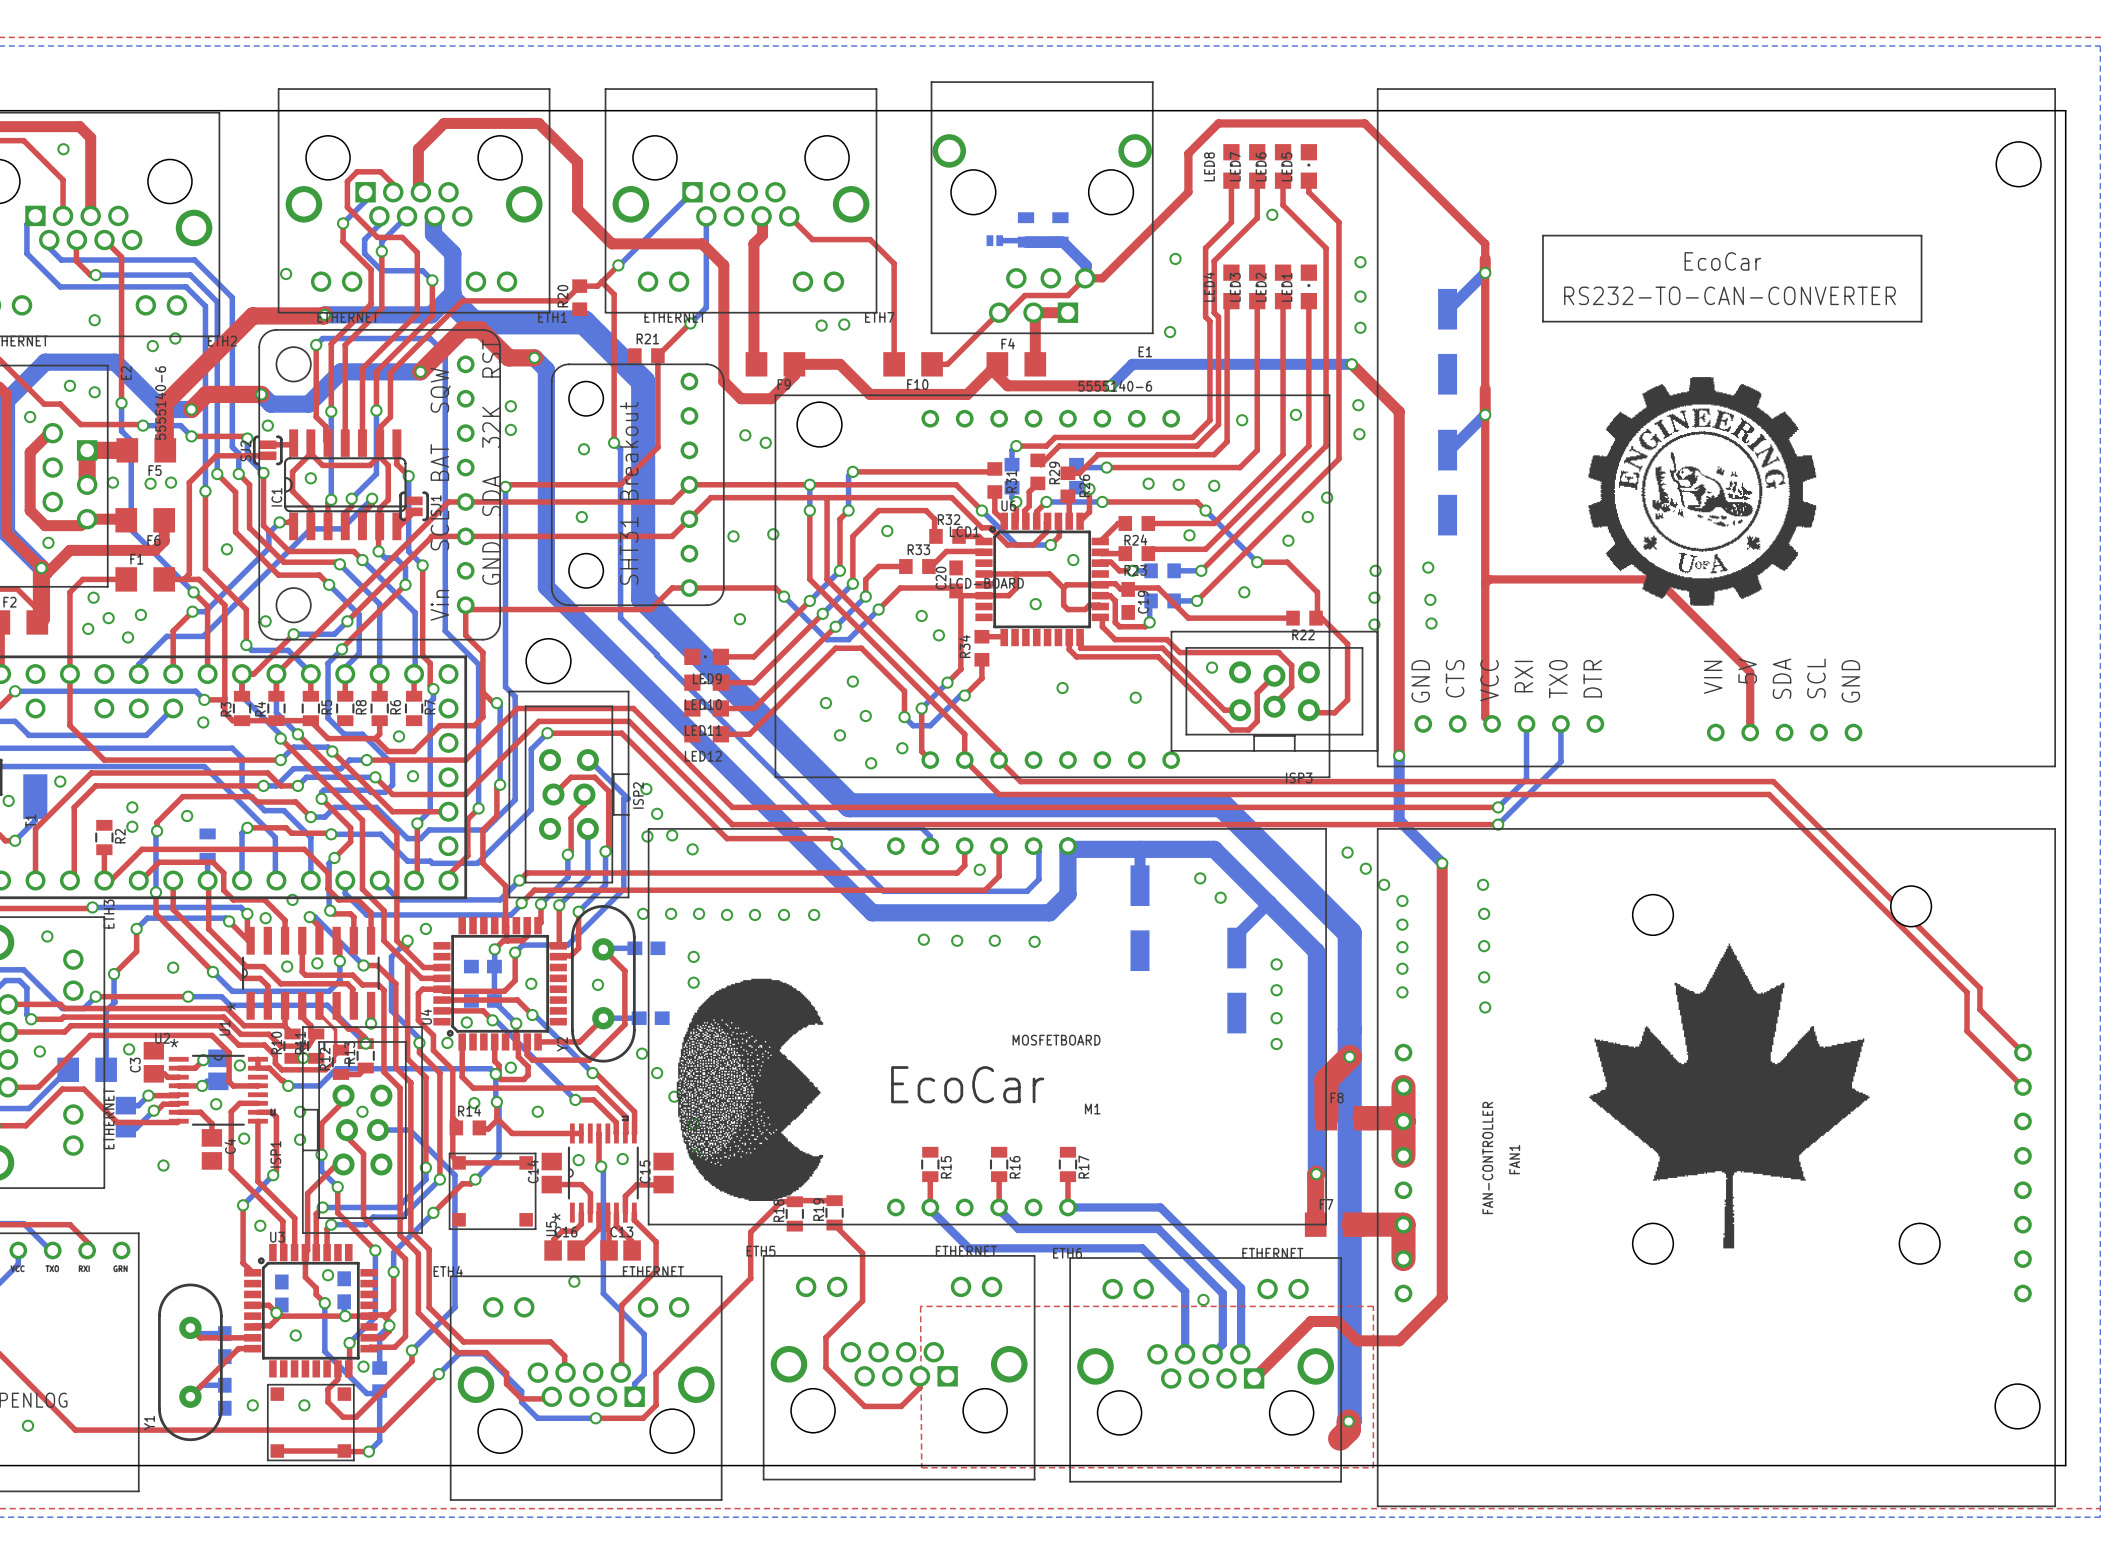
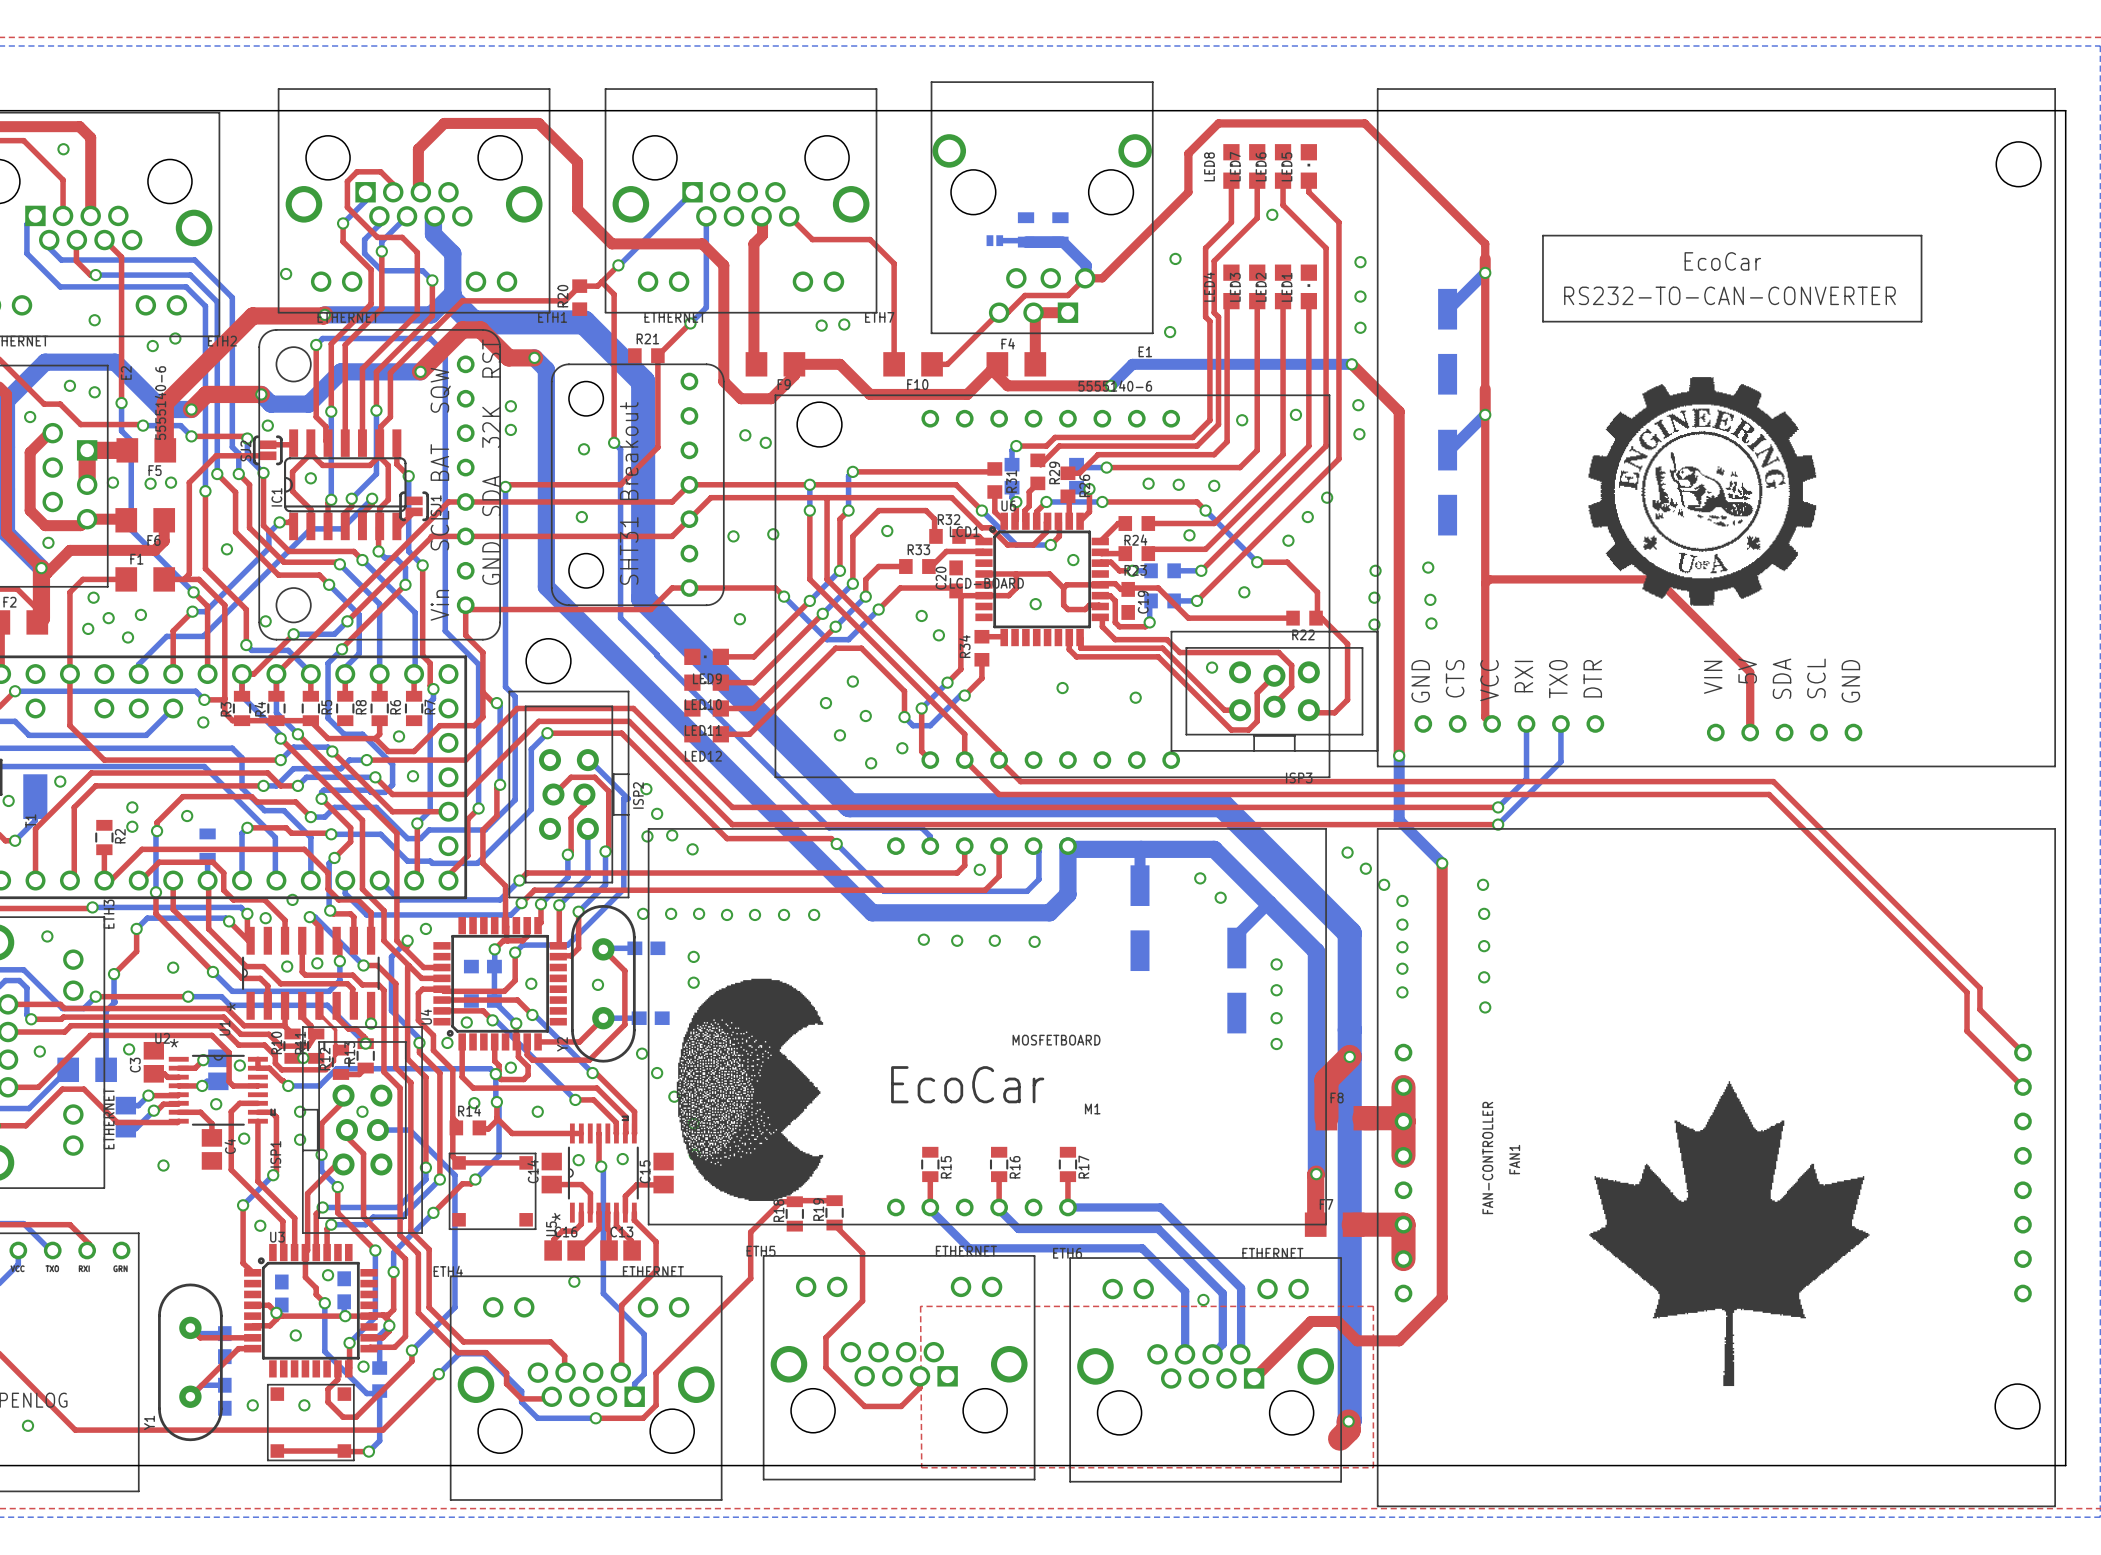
FAN1 footprint: [1376, 828, 2056, 1508] -> [1376, 828, 2056, 1508]

